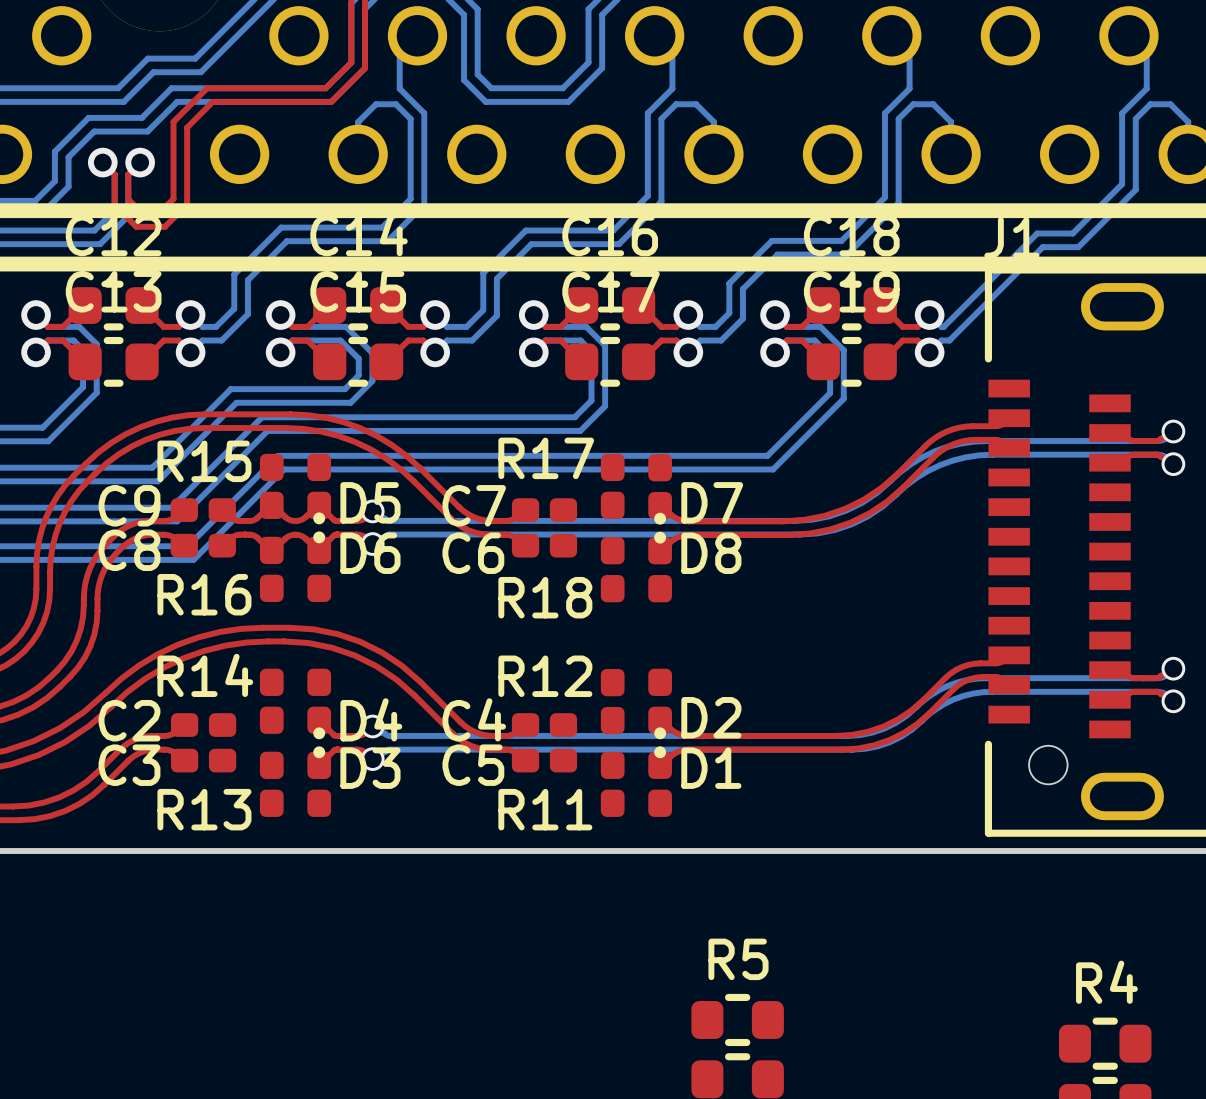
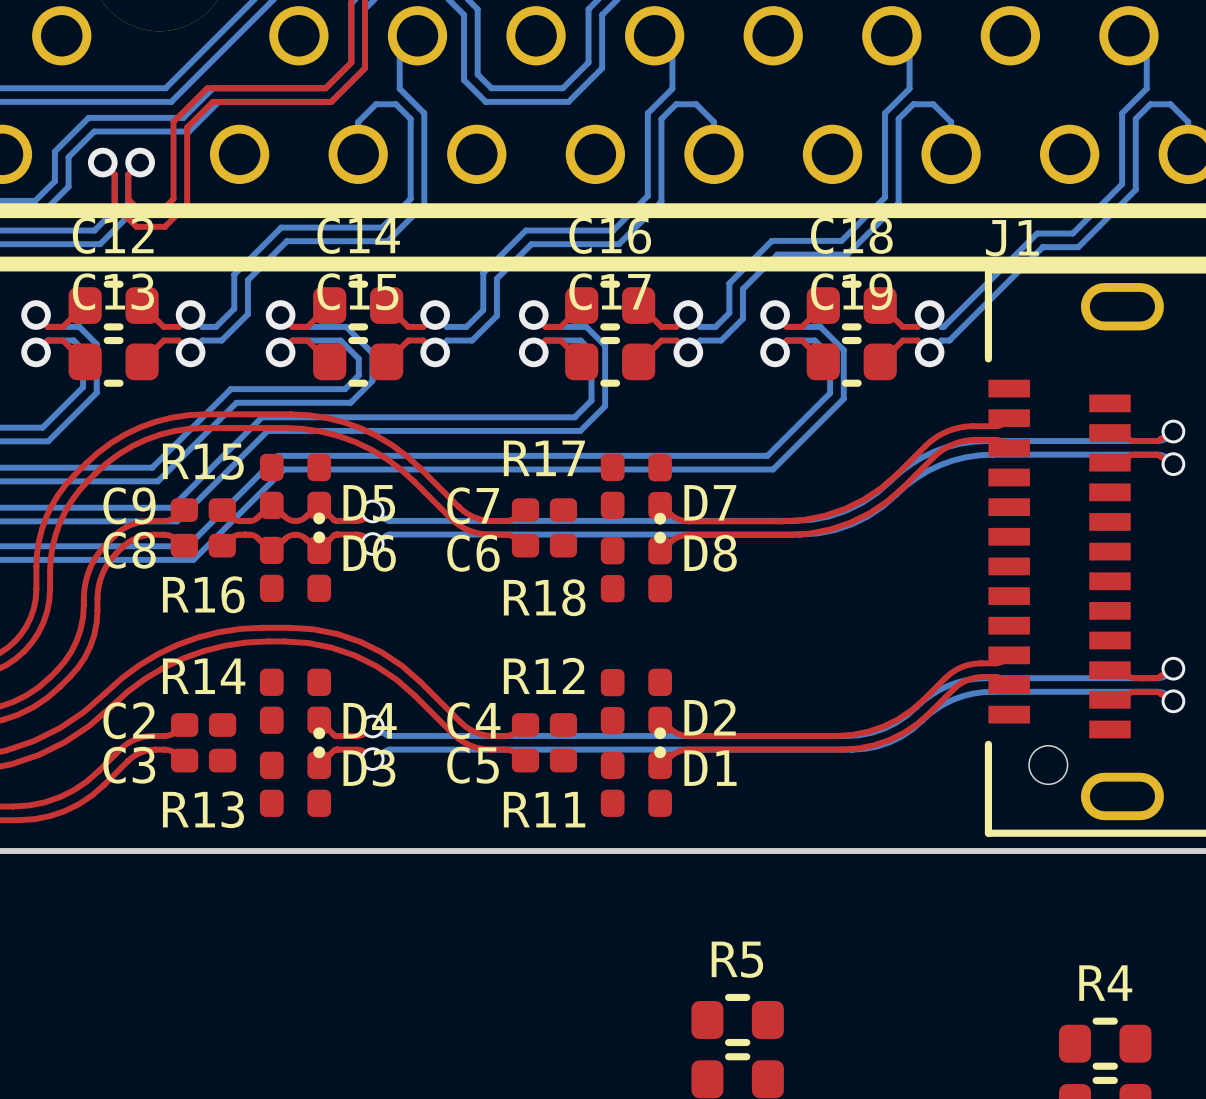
bottom track: (195, 58) (147, 58) (118, 88) -> (195, 58) (165, 88) (118, 88)
bottom track: (200, 72) (153, 72) (123, 101) -> (200, 72) (171, 101) (123, 101)
bottom track: (213, 88) (171, 88) (141, 117) -> (213, 88) (183, 117) (141, 117)
bottom track: (218, 101) (177, 101) (147, 131) -> (218, 101) (189, 131) (147, 131)

